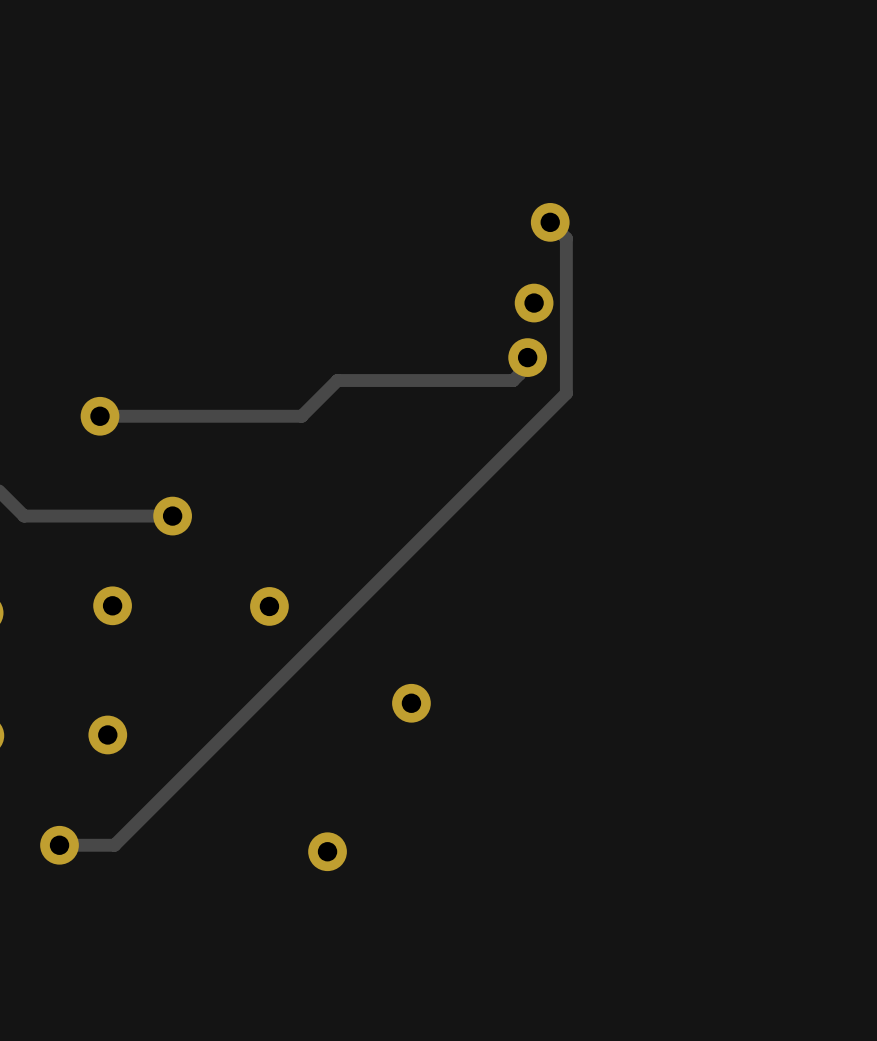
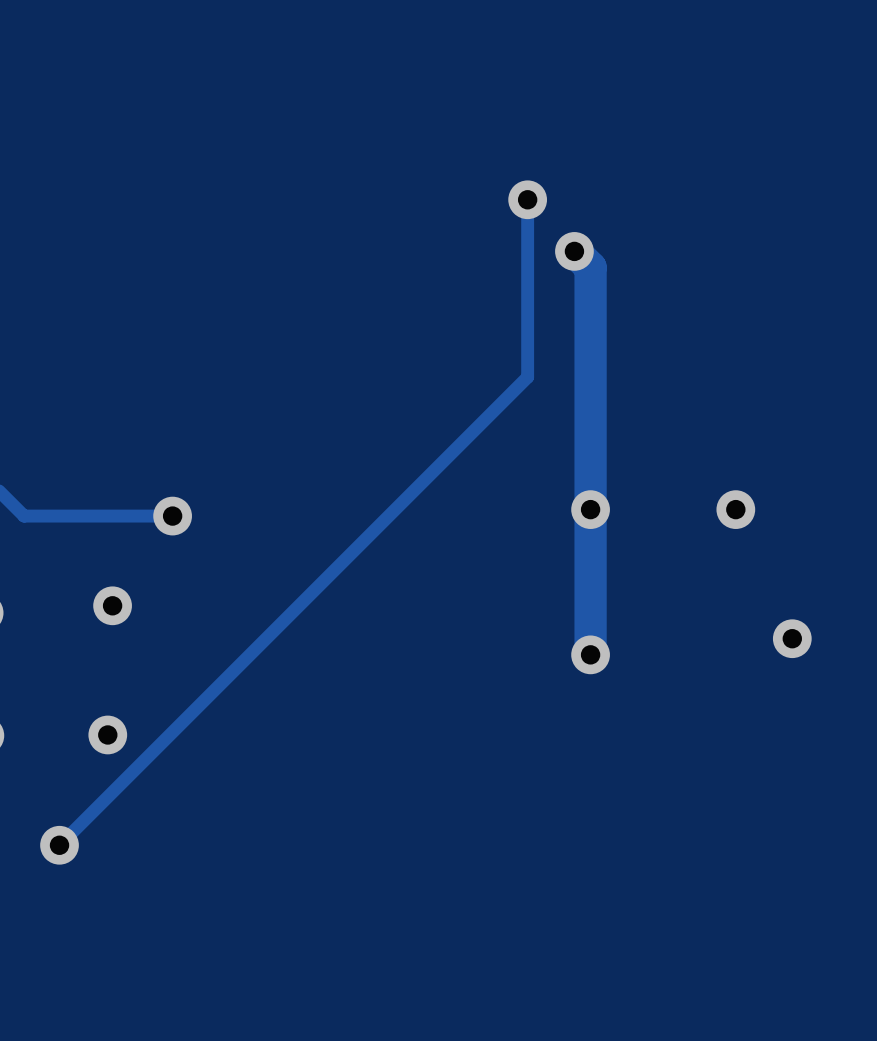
via: none -> (527, 199)
track: (550, 222) (566, 238) (566, 393) (114, 845) (59, 845) -> (527, 199) (527, 377) (59, 845)
via: (550, 222) -> none
track: none -> (574, 251) (590, 267) (590, 654)
via: none -> (574, 251)
via: (534, 303) -> none
track: (527, 357) (519, 365) (519, 374) (513, 380) (337, 380) (301, 416) (100, 416) -> none
via: (527, 357) -> none
via: (100, 416) -> none
via: none -> (590, 509)
via: none -> (735, 509)
via: (269, 606) -> none
via: none -> (792, 638)
via: none -> (590, 654)
via: (411, 703) -> none
via: (327, 851) -> none

